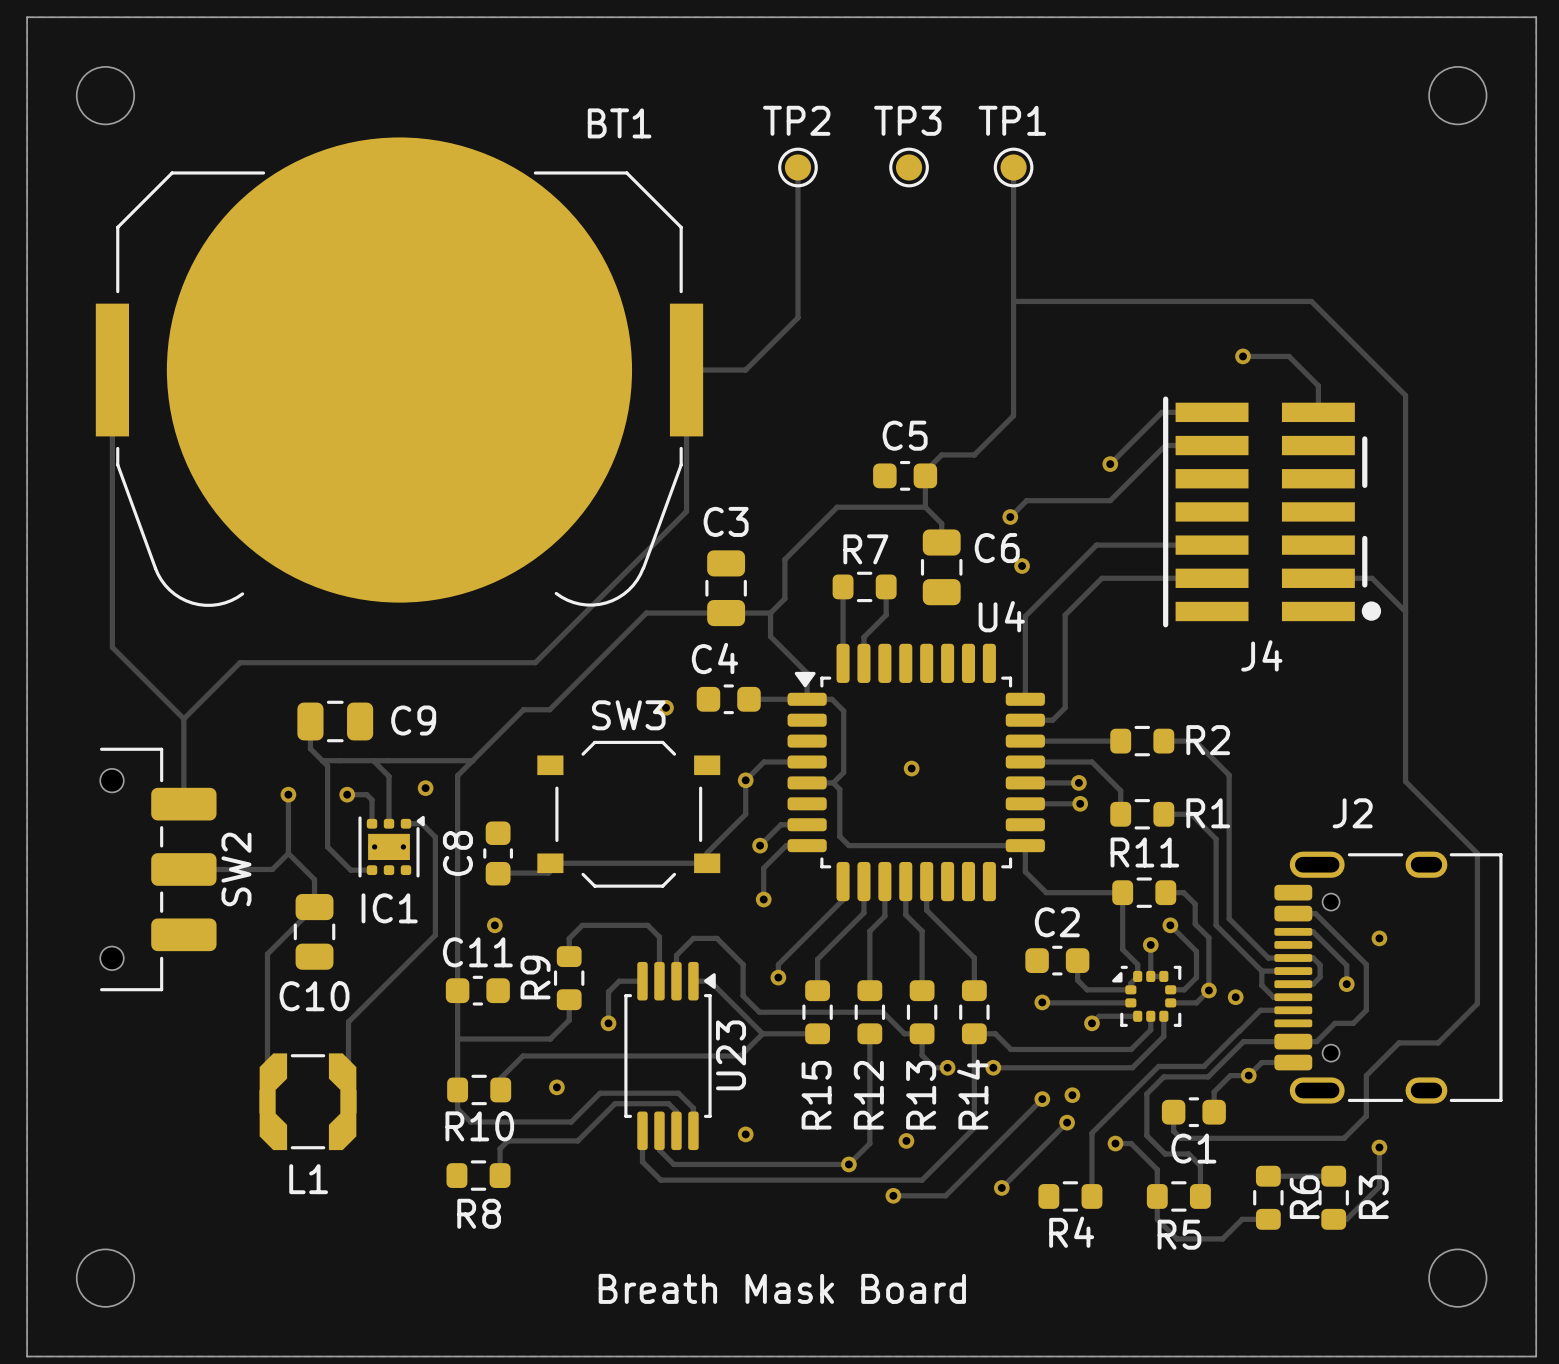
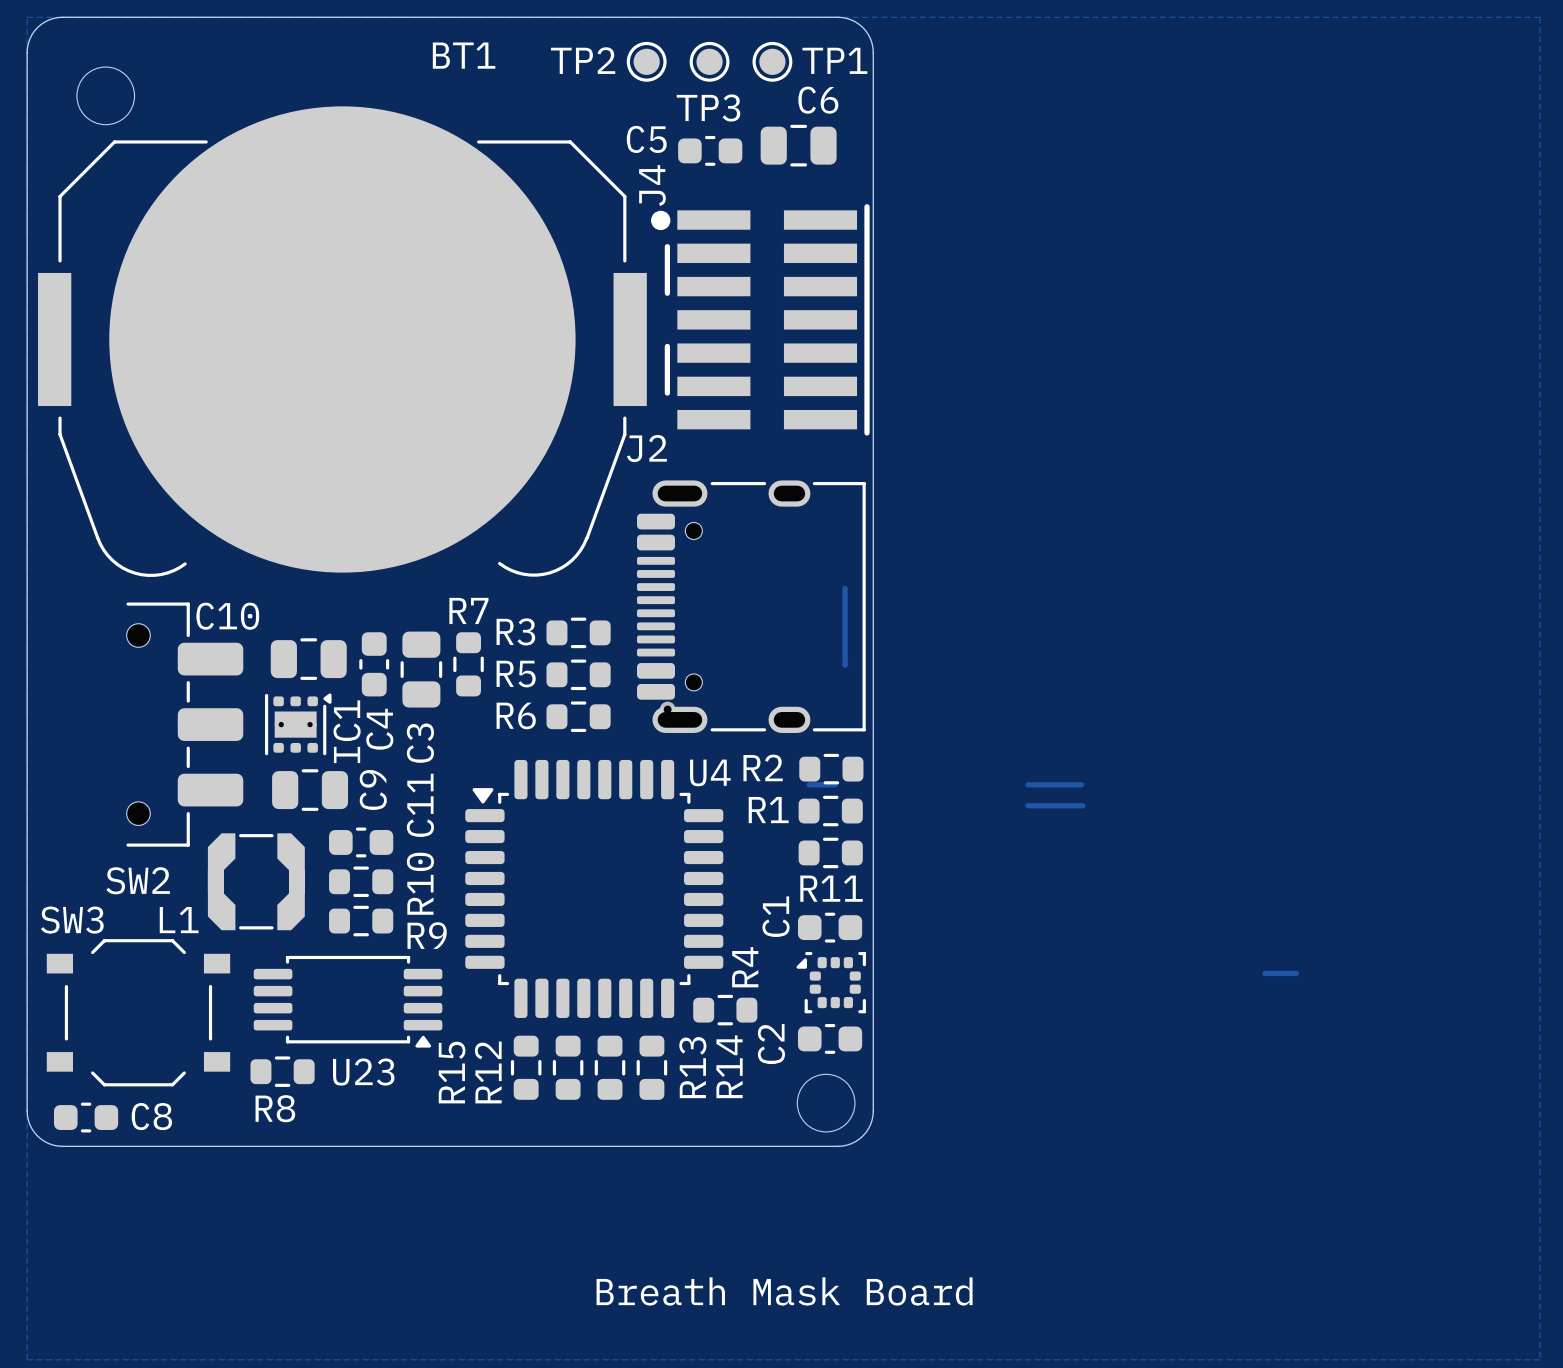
board edge: (62, 17) (27, 17) (27, 52) -> (62, 17) (48, 19) (37, 27) (29, 39) (27, 52)
board edge: (835, 17) (1536, 17) (1536, 1356) (27, 1356) (27, 1108) -> (837, 17) (851, 19) (862, 27) (870, 39) (873, 52) (873, 1110) (870, 1124) (865, 1132) (855, 1141) (837, 1146) (62, 1146) (48, 1143) (37, 1135) (29, 1124) (27, 1110)
round board edge: [1429, 66, 1487, 125] -> none
TP2 name position: TP2 (796, 120) -> TP2 (583, 60)
TP3 name position: TP3 (907, 120) -> TP3 (708, 107)
TP1 name position: TP1 (1012, 120) -> TP1 (834, 60)
BT1 name position: BT1 (619, 123) -> BT1 (464, 55)
track: (797, 167) (797, 317) (745, 370) (686, 370) (686, 511) (535, 662) (240, 662) (183, 718) -> none
TP2 position: (797, 167) -> (646, 61)
TP3 position: (909, 167) -> (709, 61)
track: (1013, 167) (1013, 415) (974, 454) (941, 454) (925, 471) (925, 507) -> none
TP1 position: (1013, 167) -> (772, 61)
track: (1013, 301) (1311, 301) (1405, 395) (1405, 781) (1477, 853) (1477, 1003) (1438, 1042) (1399, 1042) (1366, 1075) (1366, 1116) (1344, 1138) (1180, 1138) (1173, 1131) (1173, 1112) -> none
track: (1243, 356) (1289, 356) (1318, 385) (1318, 412) -> none
via: (1243, 356) -> none
track: (112, 370) (112, 647) (183, 718) -> none
BT1 position: (399, 372) -> (342, 341)
track: (1212, 412) (1162, 412) (1110, 464) -> none
C5 name position: C5 (905, 435) -> C5 (646, 139)
track: (1212, 445) (1165, 445) (1110, 500) (1026, 500) (1010, 517) -> none
via: (1110, 464) -> none
C5 position: (905, 475) -> (710, 150)
track: (925, 507) (941, 523) (941, 542) -> none
track: (925, 507) (837, 507) (784, 559) (784, 598) (770, 613) -> none
J4 rotation: 0° (1272, 511) -> 180° (760, 319)
J4 position: (1272, 511) -> (760, 319)
via: (1010, 517) -> none
C3 name rotation: 0° (726, 521) -> 90° counterclockwise (420, 743)
C3 name position: C3 (726, 521) -> C3 (420, 743)
track: (1212, 545) (1096, 545) (1025, 616) (1025, 699) -> none
via: (1022, 566) -> none
C6 rotation: 0° (941, 567) -> 90° clockwise (798, 145)
C6 position: (941, 567) -> (798, 145)
track: (1212, 578) (1101, 578) (1065, 615) (1065, 707) (1052, 720) (1025, 720) -> none
track: (1318, 578) (1372, 578) (1405, 611) -> none
R7 rotation: 0° (864, 586) -> 90° clockwise (468, 664)
R7 position: (864, 586) -> (468, 664)
track: (886, 586) (886, 615) (863, 637) (863, 663) -> none
C3 position: (726, 588) -> (421, 669)
track: (770, 613) (646, 613) (549, 709) (523, 709) (457, 775) (457, 1108) (470, 1121) (571, 1121) (600, 1093) (678, 1093) (693, 1108) (693, 1130) -> none
track: (770, 613) (770, 636) (807, 673) (807, 699) -> none
U4 name position: U4 (1001, 616) -> U4 (710, 772)
J4 name position: J4 (1261, 655) -> J4 (652, 185)
C4 name position: C4 (714, 658) -> C4 (379, 729)
track: (749, 698) (831, 699) (843, 711) (843, 772) (833, 782) (839, 789) (839, 836) (848, 845) (1025, 845) (1025, 871) (1046, 892) (1122, 892) (1122, 949) (1137, 964) (1137, 976) (1130, 983) (1130, 989) (1087, 989) (1077, 980) (1077, 960) -> none
C4 rotation: 0° (728, 699) -> 90° clockwise (374, 664)
C4 position: (728, 699) -> (374, 664)
SW3 name position: SW3 (628, 715) -> SW3 (72, 920)
track: (183, 718) (183, 804) -> none
C9 name rotation: 0° (413, 720) -> 90° counterclockwise (373, 789)
track: (310, 721) (310, 748) (327, 765) (327, 846) (350, 870) (372, 870) -> none
C9 position: (335, 721) -> (310, 790)
R2 name position: R2 (1208, 740) -> R2 (763, 767)
track: (1025, 741) (1120, 741) -> none
R2 position: (1142, 741) -> (831, 769)
track: (1163, 741) (1195, 741) (1229, 775) (1229, 918) (1268, 958) (1313, 958) (1320, 965) (1320, 977) (1313, 984) (1293, 984) -> none
track: (322, 760) (472, 760) -> none
track: (373, 760) (389, 776) (389, 823) -> none
track: (807, 762) (764, 762) (745, 780) (745, 814) (707, 852) (707, 863) (550, 863) (550, 871) (548, 873) (498, 873) -> none
track: (1025, 762) (1091, 762) (1120, 790) (1120, 814) -> none
via: (911, 768) -> none
U4 position: (916, 772) -> (594, 888)
via: (745, 780) -> none
via: (1078, 782) -> none
via: (425, 788) -> none
track: (288, 794) (288, 853) -> none
via: (288, 794) -> none
track: (347, 794) (366, 794) (372, 799) (372, 823) -> none
via: (347, 794) -> none
via: (1080, 803) -> none
R1 name position: R1 (1208, 813) -> R1 (768, 810)
J2 name position: J2 (1352, 813) -> J2 (646, 448)
SW3 position: (628, 814) -> (138, 1012)
R1 position: (1142, 814) -> (830, 811)
track: (1163, 814) (1191, 814) (1216, 839) (1216, 925) (1261, 971) (1261, 985) (1273, 997) (1293, 997) -> none
track: (406, 823) (422, 823) (435, 837) (435, 935) (348, 1022) (348, 1101) -> none
track: (807, 824) (780, 824) (760, 845) -> none
via: (760, 845) -> none
track: (807, 845) (786, 845) (763, 868) (763, 899) -> none
IC1 position: (391, 846) -> (298, 724)
R11 name position: R11 (1144, 852) -> R11 (831, 888)
track: (288, 853) (314, 879) (314, 907) (267, 954) (267, 1101) -> none
track: (288, 853) (272, 869) (183, 869) -> none
C8 name position: C8 (457, 853) -> C8 (151, 1116)
C8 rotation: 0° (498, 853) -> 90° clockwise (86, 1117)
C8 position: (498, 853) -> (86, 1117)
SW2 position: (158, 869) -> (184, 724)
SW2 name rotation: 0° (236, 869) -> 90° clockwise (138, 880)
SW2 name position: SW2 (236, 869) -> SW2 (138, 880)
track: (843, 881) (843, 899) (778, 964) (778, 977) -> none
track: (863, 881) (863, 912) (817, 959) (817, 990) -> none
track: (884, 881) (884, 916) (869, 931) (869, 990) -> none
track: (905, 881) (905, 914) (922, 931) (922, 990) -> none
track: (926, 881) (926, 910) (974, 958) (974, 990) -> none
R11 position: (1144, 892) -> (830, 852)
via: (763, 899) -> none
track: (1167, 899) (1165, 892) (1183, 892) (1195, 904) (1195, 924) (1208, 937) (1208, 990) (1196, 1002) (1170, 1002) -> none
IC1 name rotation: 0° (389, 908) -> 90° counterclockwise (347, 731)
track: (1293, 913) (1315, 913) (1366, 964) (1366, 1010) (1353, 1023) (1335, 1023) (1316, 1041) (1243, 1041) (1208, 1076) (1163, 1076) (1146, 1093) (1146, 1135) (1165, 1154) (1188, 1154) (1200, 1165) (1200, 1196) -> none
C2 name rotation: 0° (1057, 922) -> 90° counterclockwise (771, 1044)
C2 name position: C2 (1057, 922) -> C2 (771, 1044)
via: (494, 925) -> none
track: (1170, 925) (1196, 951) (1196, 977) (1184, 989) (1170, 989) -> none
via: (1170, 925) -> none
C10 rotation: 0° (314, 931) -> 90° clockwise (308, 659)
C10 position: (314, 931) -> (308, 659)
track: (1293, 931) (1313, 931) (1346, 965) (1346, 984) -> none
via: (1379, 938) -> none
track: (1150, 944) (1150, 976) (1163, 976) -> none
via: (1150, 944) -> none
C11 name rotation: 0° (477, 952) -> 90° counterclockwise (420, 805)
track: (569, 956) (569, 938) (582, 925) (647, 925) (659, 937) (659, 981) -> none
C2 position: (1057, 960) -> (830, 1038)
R9 name position: R9 (535, 977) -> R9 (427, 935)
via: (778, 977) -> none
J2 position: (1388, 977) -> (751, 606)
R9 rotation: 0° (569, 978) -> 90° clockwise (361, 921)
R9 position: (569, 978) -> (361, 921)
track: (642, 981) (619, 981) (608, 991) (608, 1023) -> none
track: (676, 981) (676, 955) (693, 938) (716, 938) (743, 964) (743, 995) (759, 1012) (882, 1012) (904, 1033) (922, 1033) (922, 1055) (934, 1067) (947, 1067) -> none
track: (693, 981) (710, 981) (762, 1033) -> none
via: (1346, 984) -> none
C11 position: (477, 990) -> (361, 842)
via: (1208, 990) -> none
part position: (1146, 996) -> (831, 982)
via: (1235, 997) -> none
track: (569, 999) (569, 1020) (550, 1039) (457, 1039) -> none
track: (1042, 1002) (1130, 1002) -> none
via: (1042, 1002) -> none
track: (1293, 1010) (1260, 1010) (1239, 1031) -> none
R15 position: (817, 1012) -> (526, 1067)
R12 position: (869, 1012) -> (568, 1067)
R13 position: (922, 1012) -> (610, 1067)
R14 position: (974, 1012) -> (651, 1067)
track: (1137, 1016) (1099, 1016) (1091, 1023) -> none
track: (1150, 1016) (1150, 1029) (1131, 1049) (1010, 1049) (995, 1033) (974, 1033) (974, 1127) (922, 1180) (660, 1180) (642, 1161) (642, 1130) -> none
track: (1163, 1016) (1163, 1036) (1132, 1067) (993, 1067) -> none
via: (608, 1023) -> none
via: (1091, 1023) -> none
track: (1239, 1031) (1203, 1066) (1158, 1066) (1091, 1133) (1091, 1196) -> none
track: (762, 1033) (817, 1033) -> none
track: (762, 1033) (740, 1056) (522, 1056) (500, 1078) (500, 1089) -> none
track: (869, 1033) (869, 1143) (848, 1164) (673, 1164) (659, 1150) (659, 1130) -> none
U23 rotation: 0° (670, 1056) -> 90° clockwise (348, 1001)
U23 position: (670, 1056) -> (348, 1001)
track: (1293, 1062) (1261, 1062) (1248, 1075) (1230, 1075) (1214, 1091) (1214, 1112) -> none
via: (947, 1067) -> none
via: (993, 1067) -> none
round board edge: none -> [797, 1074, 855, 1132]
via: (1248, 1075) -> none
via: (556, 1087) -> none
R10 position: (479, 1089) -> (361, 881)
R14 name position: R14 (972, 1094) -> R14 (729, 1066)
R15 name position: R15 (816, 1095) -> R15 (452, 1072)
R12 name position: R12 (868, 1095) -> R12 (488, 1072)
R13 name position: R13 (921, 1095) -> R13 (692, 1067)
via: (1072, 1095) -> none
track: (1042, 1099) (945, 1195) (893, 1195) -> none
via: (1042, 1099) -> none
L1 position: (308, 1101) -> (256, 881)
C1 position: (1193, 1112) -> (830, 927)
track: (1067, 1122) (1001, 1187) -> none
via: (1067, 1122) -> none
R10 name rotation: 0° (479, 1126) -> 90° counterclockwise (420, 883)
track: (676, 1130) (676, 1111) (668, 1103) (615, 1103) (577, 1140) (507, 1140) (500, 1148) (500, 1175) -> none
via: (745, 1134) -> none
via: (906, 1140) -> none
track: (1115, 1143) (1131, 1143) (1157, 1169) (1157, 1219) (1176, 1238) (1222, 1238) (1242, 1219) (1268, 1219) -> none
via: (1115, 1143) -> none
track: (1379, 1147) (1379, 1186) (1346, 1219) (1333, 1219) -> none
via: (1379, 1147) -> none
C1 name rotation: 0° (1193, 1148) -> 90° counterclockwise (776, 916)
C1 name position: C1 (1193, 1148) -> C1 (776, 916)
via: (848, 1164) -> none
R8 position: (478, 1175) -> (282, 1071)
track: (1268, 1176) (1333, 1176) -> none
L1 name position: L1 (308, 1179) -> L1 (179, 920)
via: (1001, 1187) -> none
via: (893, 1195) -> none
R4 position: (1070, 1196) -> (725, 1010)
R5 position: (1178, 1196) -> (578, 674)
R6 rotation: 0° (1268, 1197) -> 90° clockwise (578, 716)
R6 position: (1268, 1197) -> (578, 716)
R6 name position: R6 (1304, 1197) -> R6 (516, 715)
R3 rotation: 0° (1333, 1197) -> 90° clockwise (578, 632)
R3 position: (1333, 1197) -> (578, 632)
R3 name position: R3 (1373, 1197) -> R3 (515, 631)
R8 name position: R8 (479, 1213) -> R8 (275, 1108)
R4 name rotation: 0° (1071, 1232) -> 90° counterclockwise (745, 967)
R4 name position: R4 (1071, 1232) -> R4 (745, 967)
R5 name position: R5 (1179, 1234) -> R5 (516, 674)
round board edge: [76, 1249, 135, 1307] -> none
round board edge: [1429, 1249, 1487, 1307] -> none

